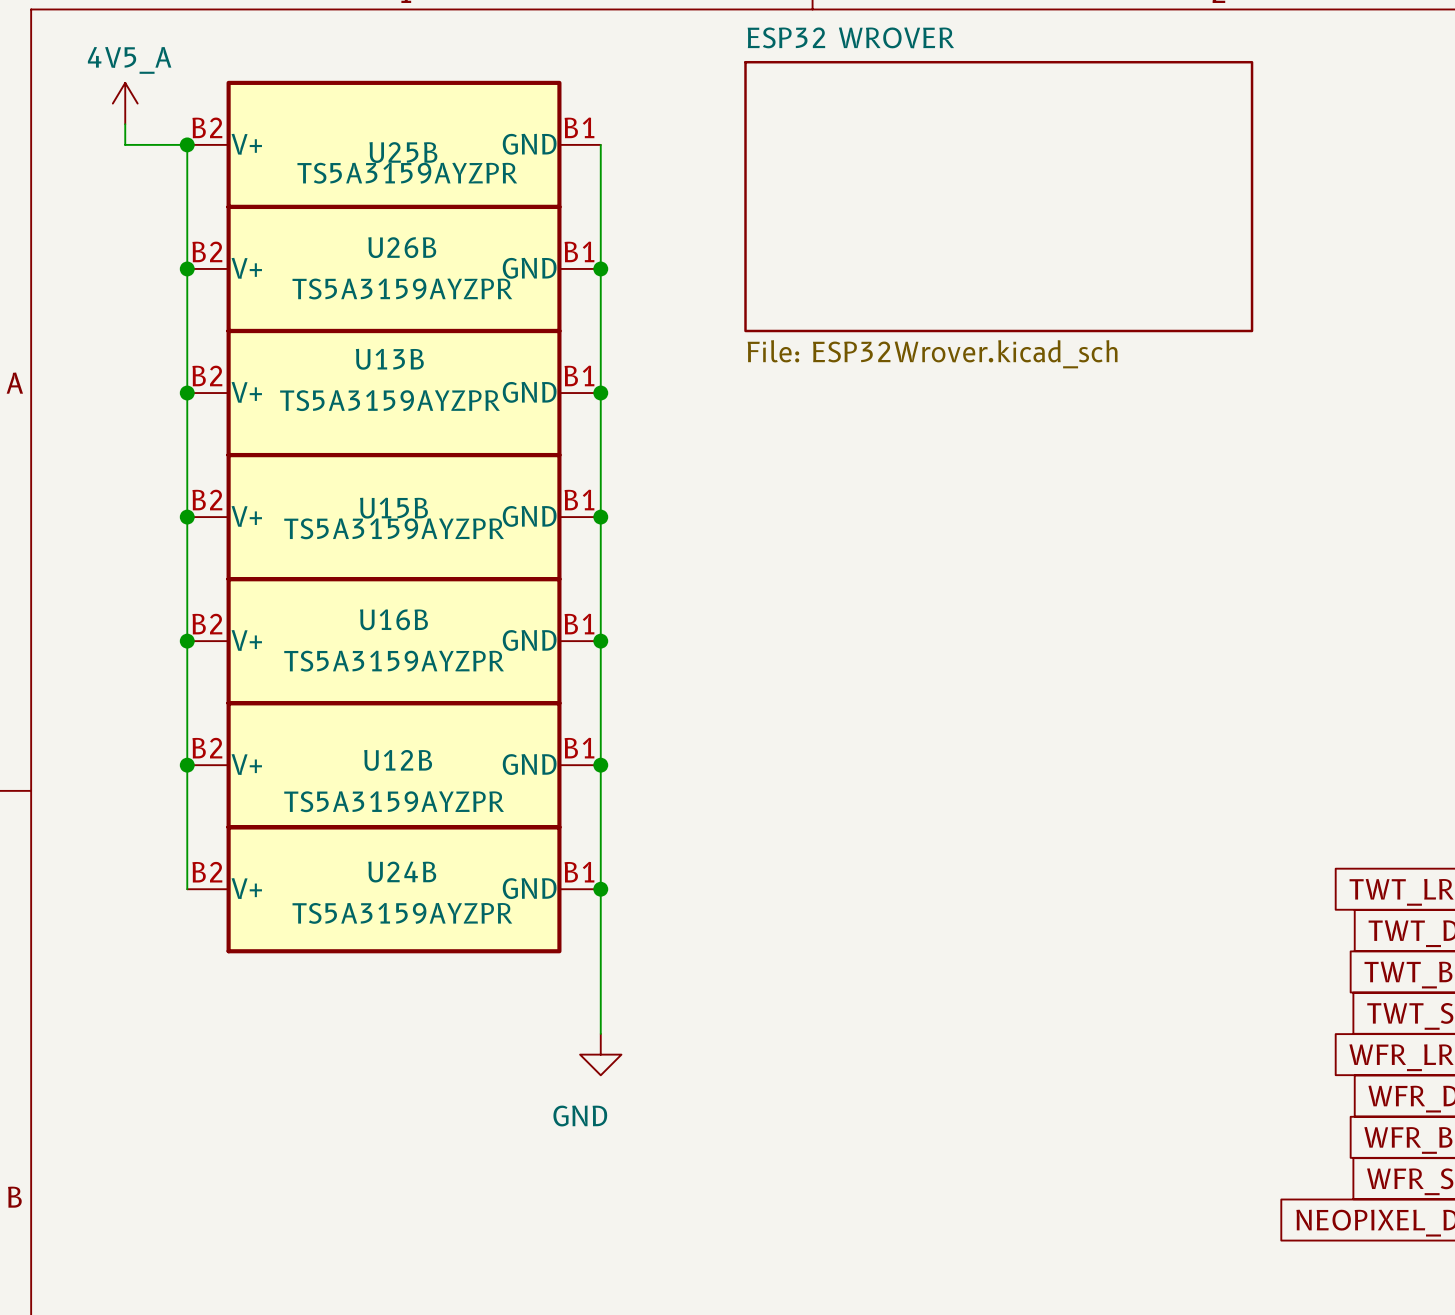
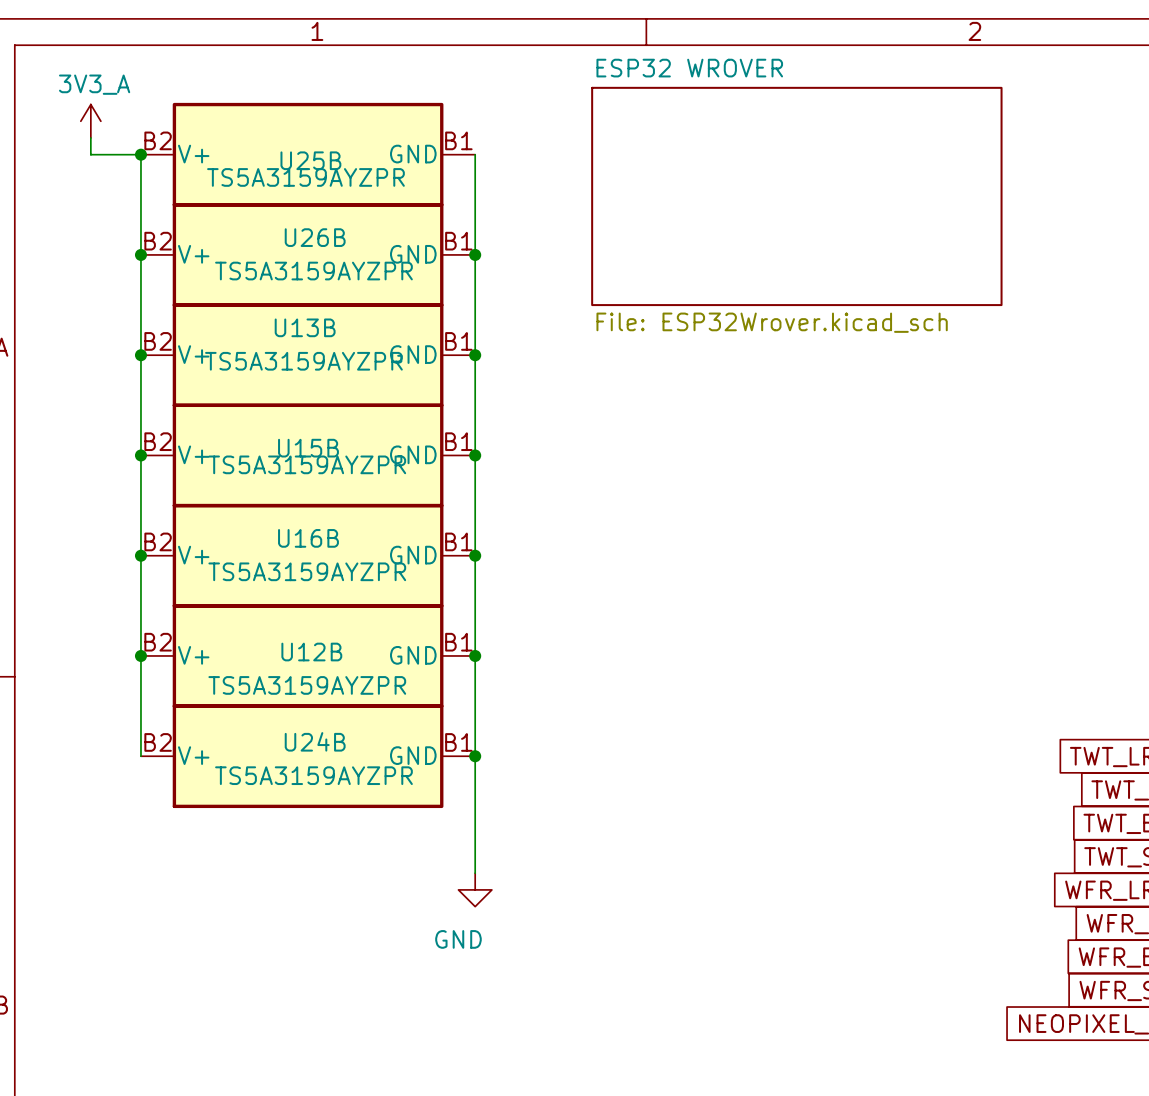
power symbol: 4V5_A (125, 103) -> 3V3_A (90, 121)

